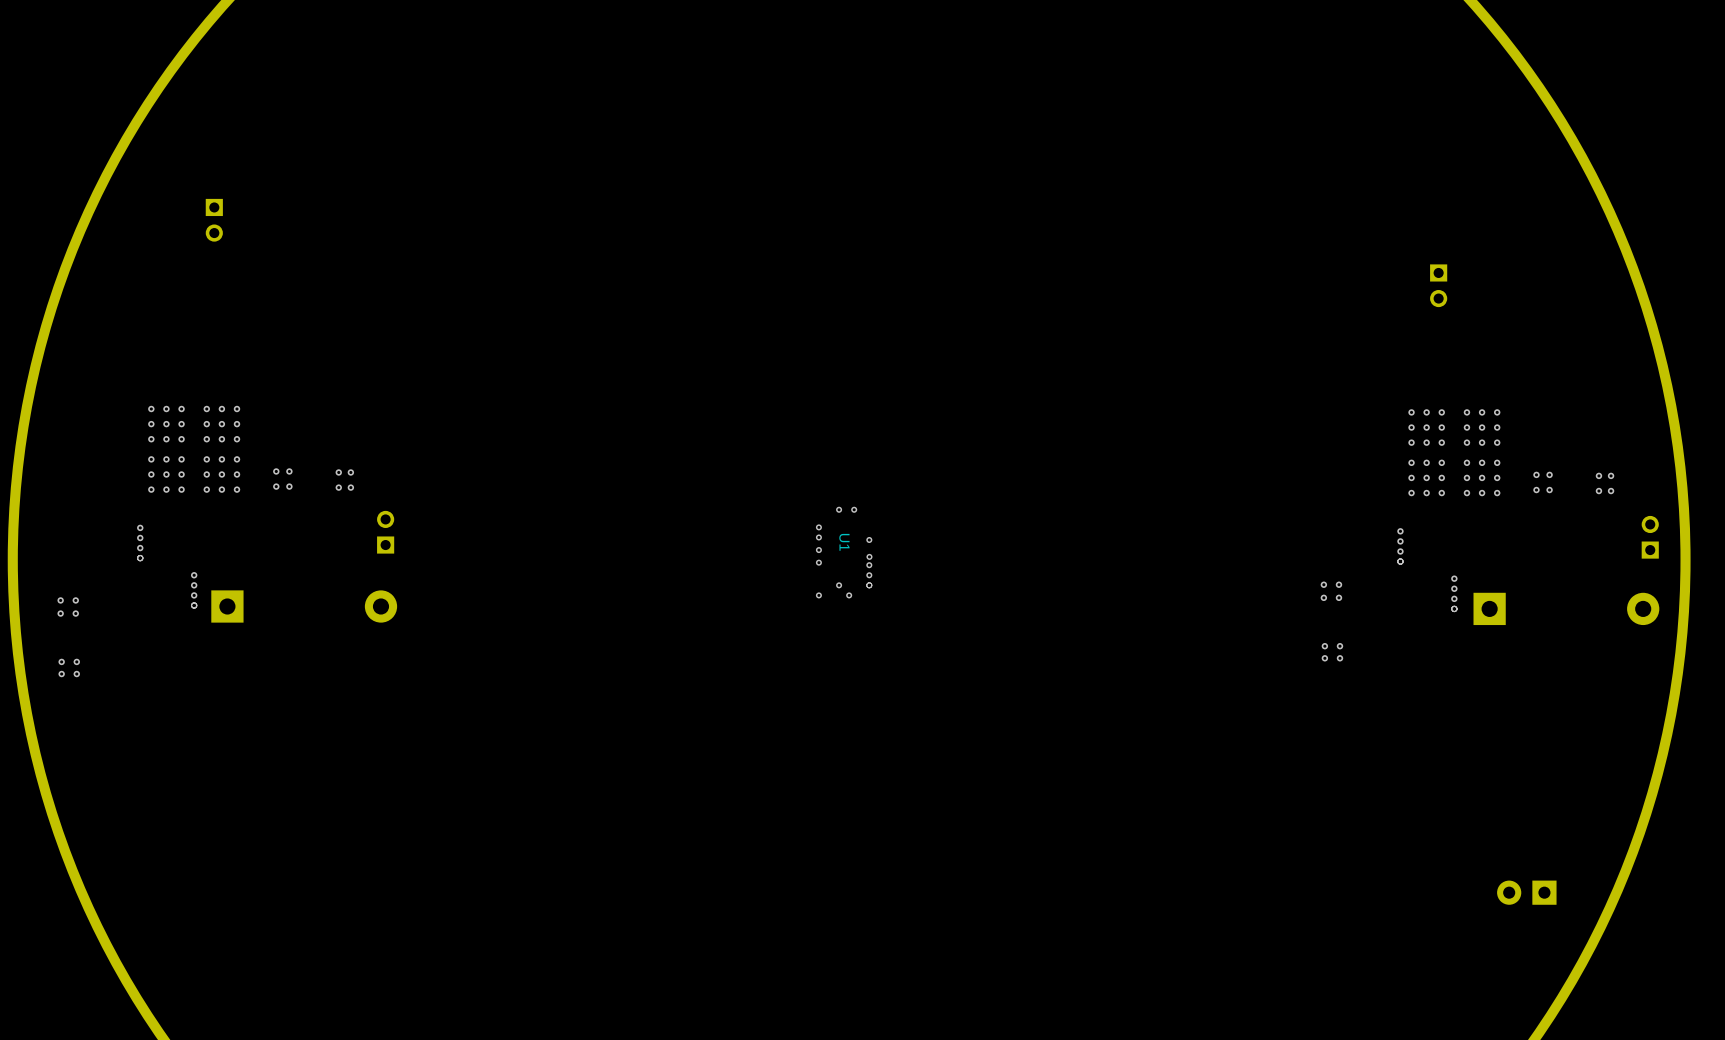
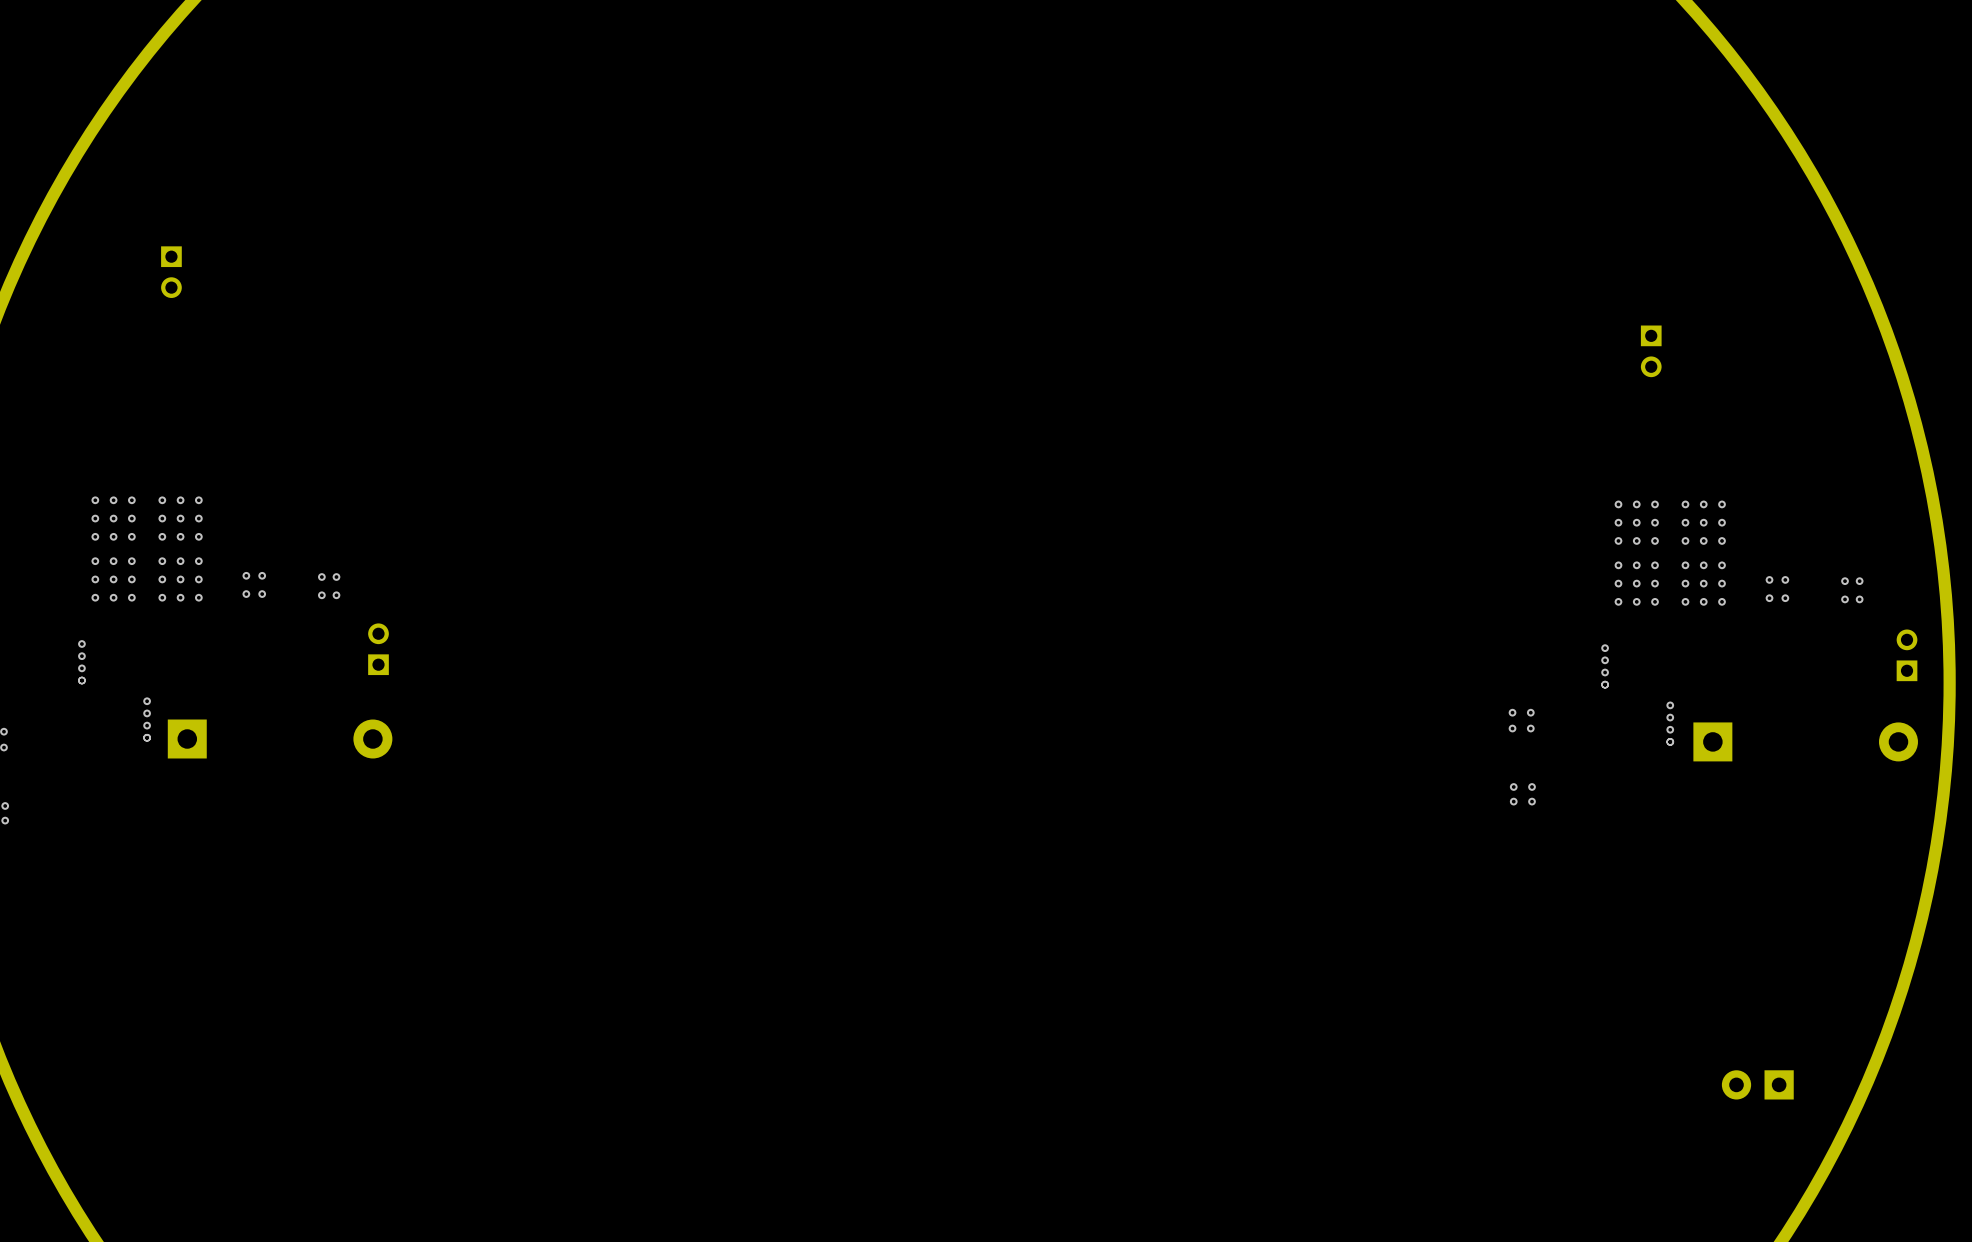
via: (839, 509) -> none
via: (854, 509) -> none
via: (818, 527) -> none
via: (818, 537) -> none
via: (869, 539) -> none
U1: (844, 542) -> none
via: (818, 550) -> none
via: (869, 556) -> none
via: (818, 562) -> none
via: (869, 565) -> none
via: (869, 575) -> none
via: (839, 585) -> none
via: (869, 585) -> none
via: (818, 595) -> none
via: (849, 595) -> none

